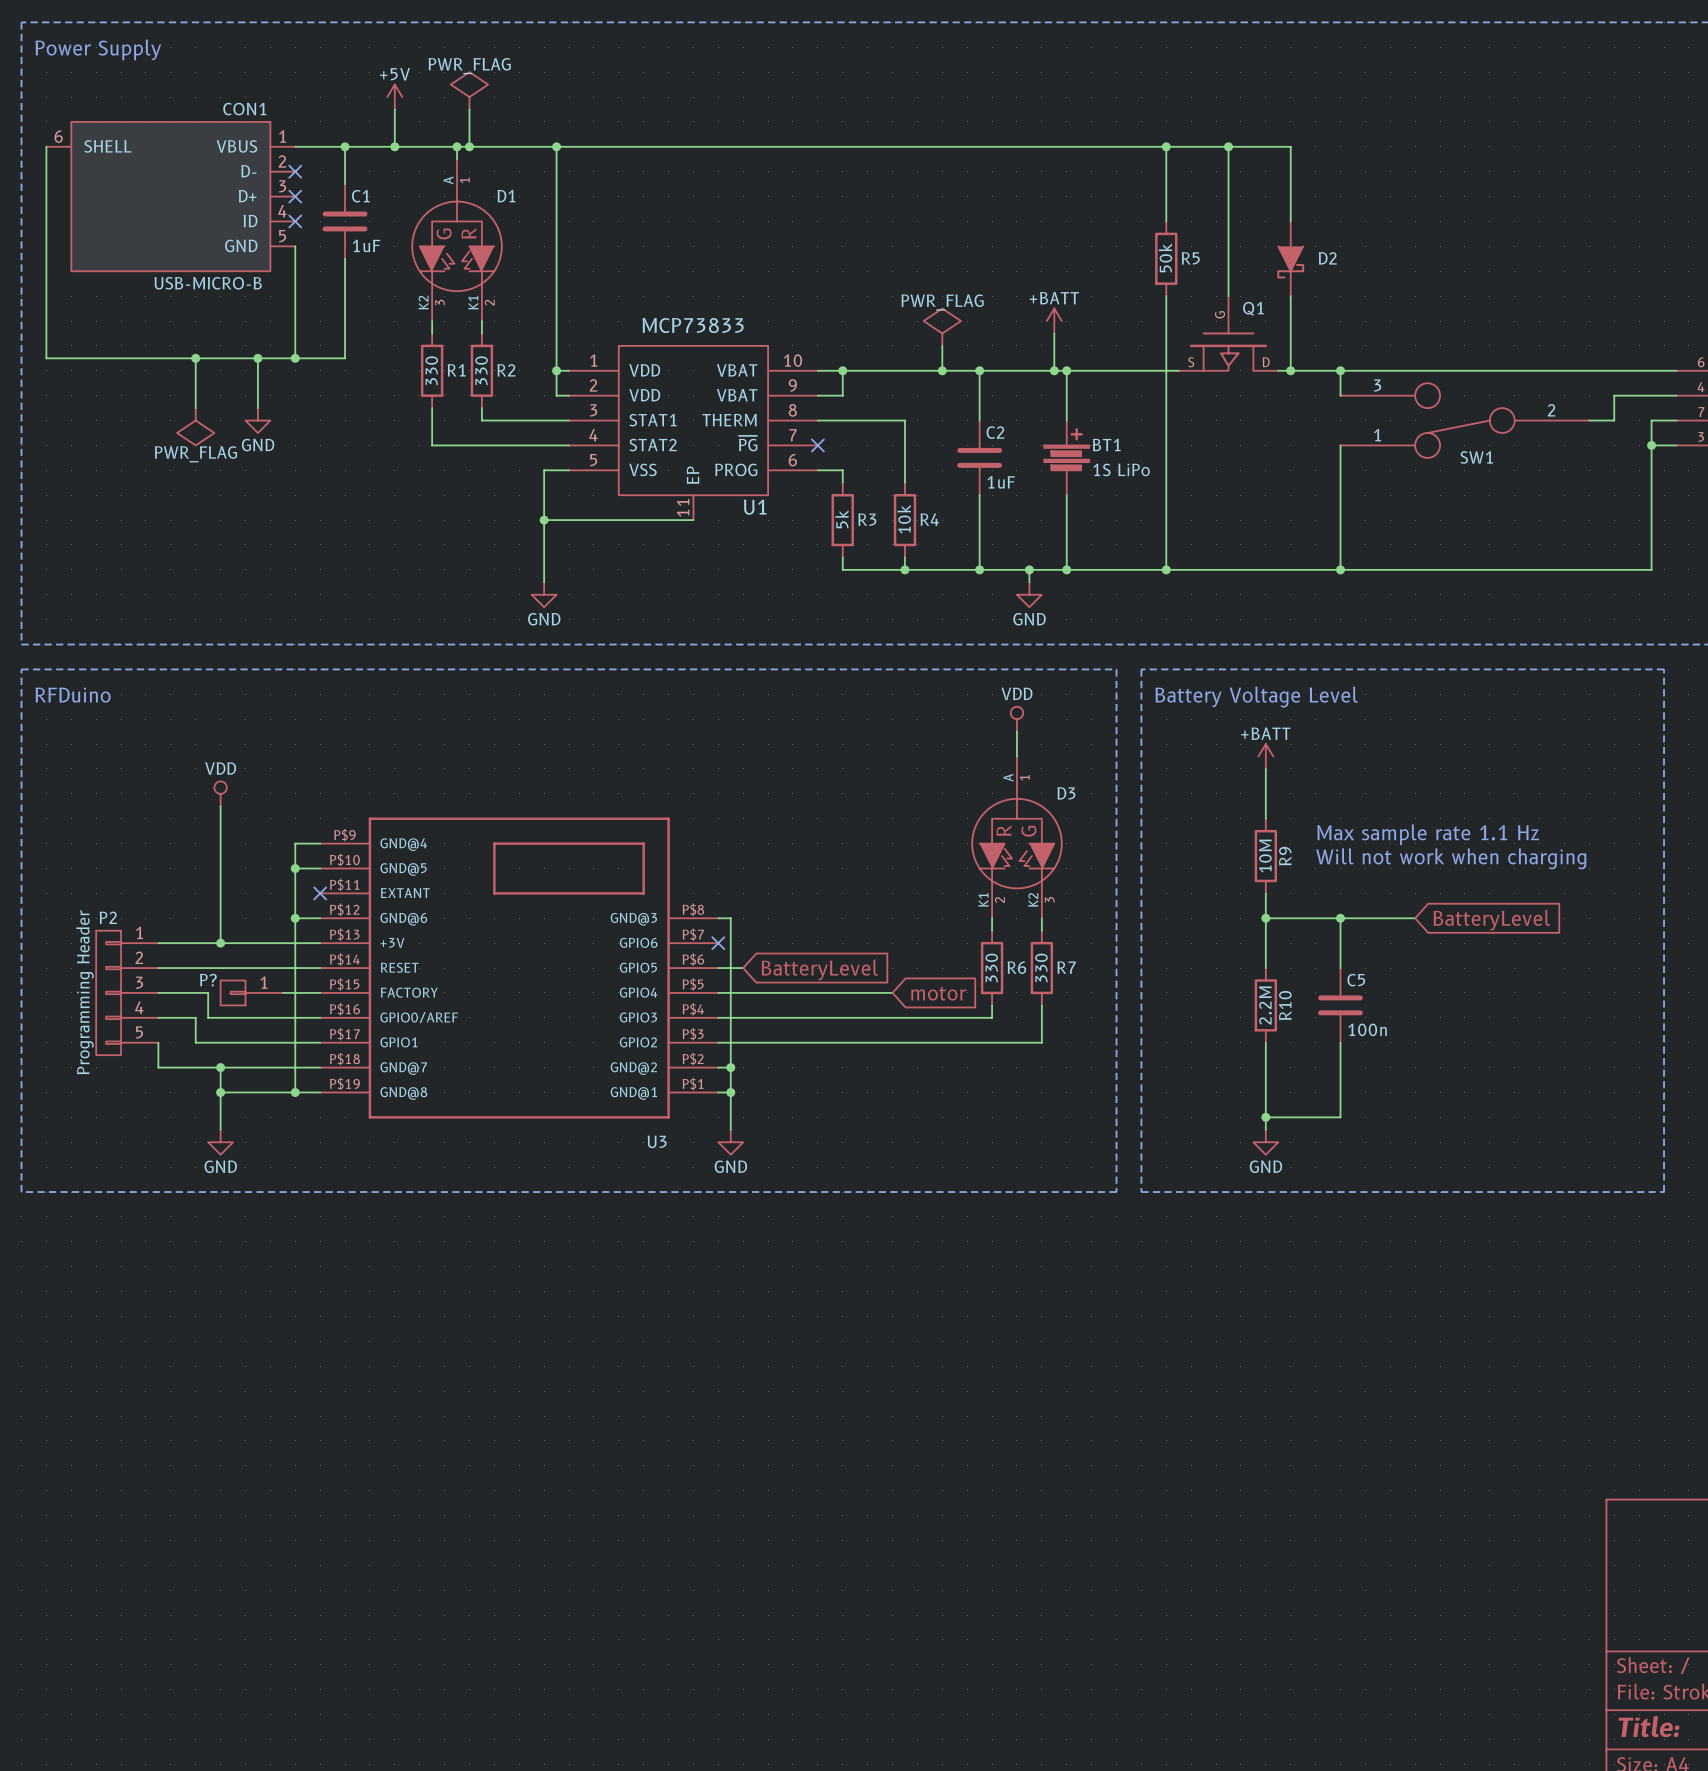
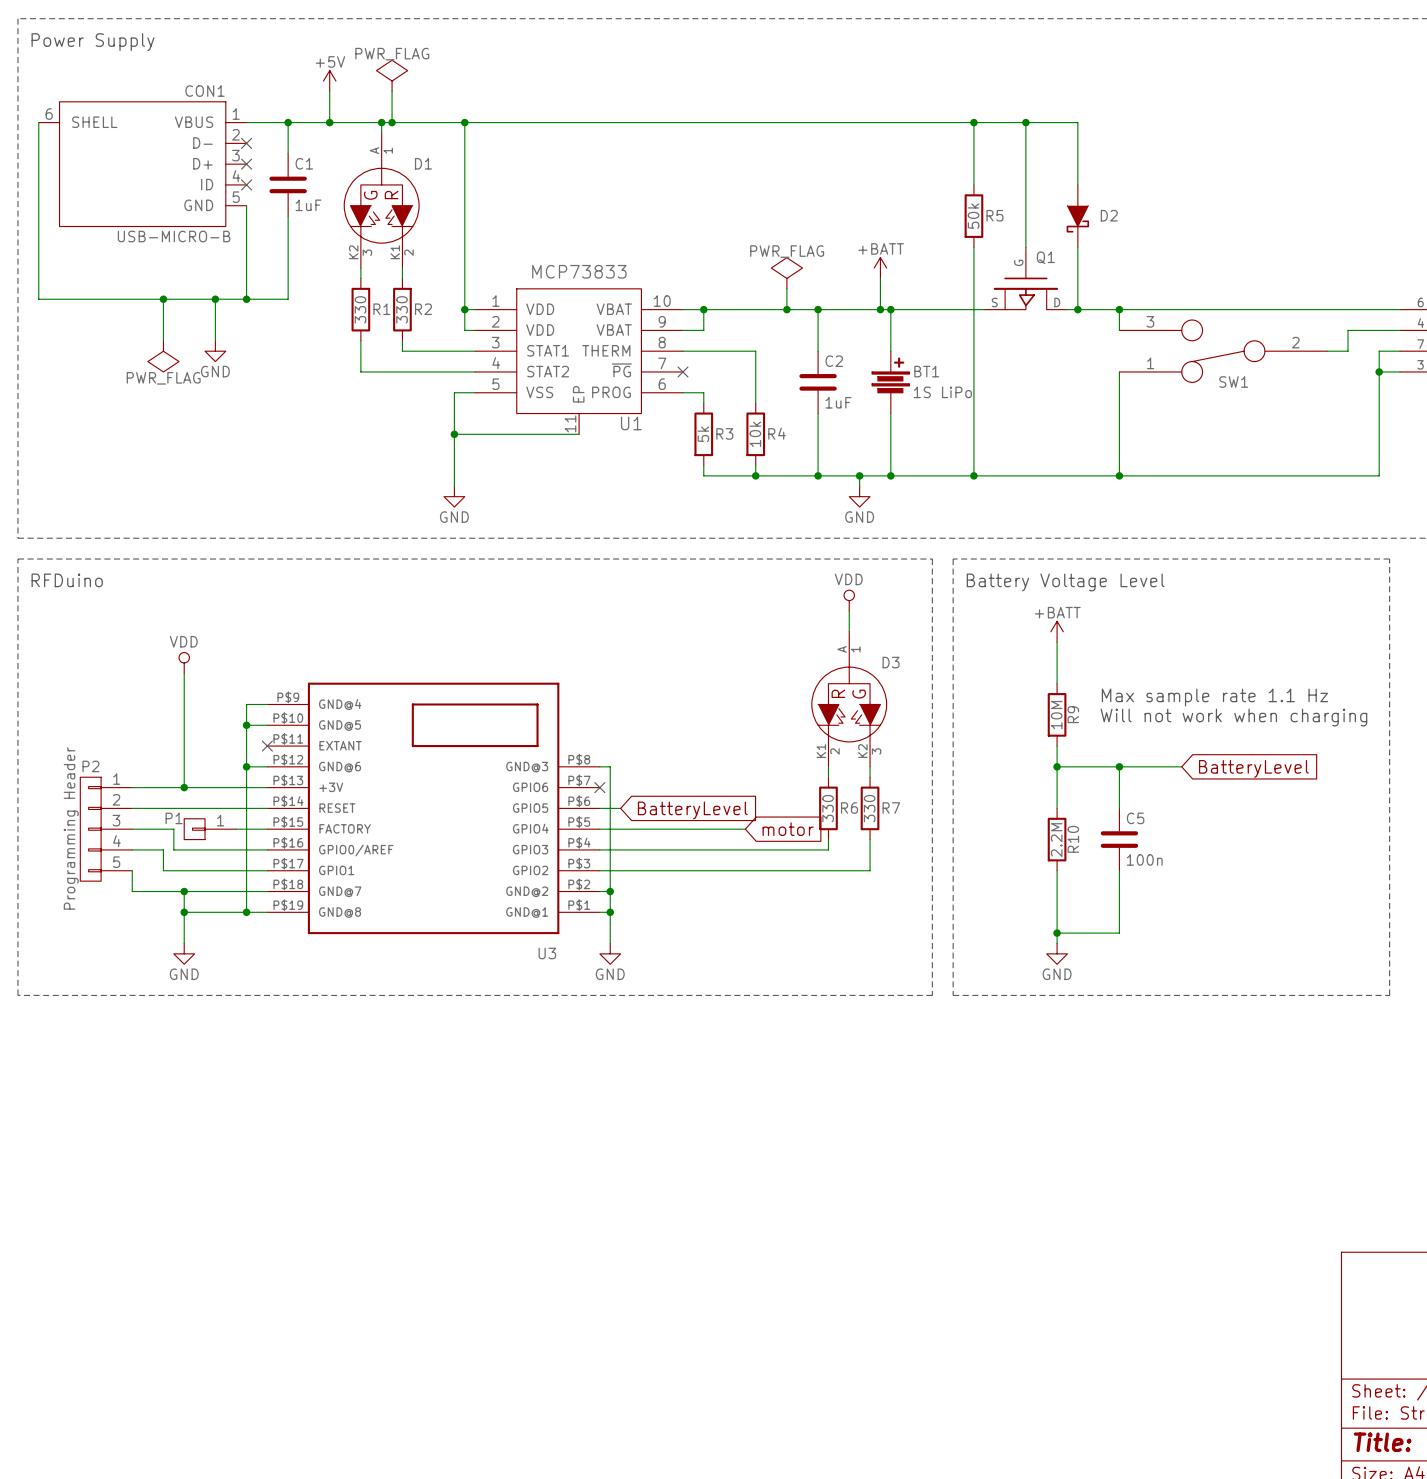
P? name: P? (208, 980) -> P1 (174, 818)

